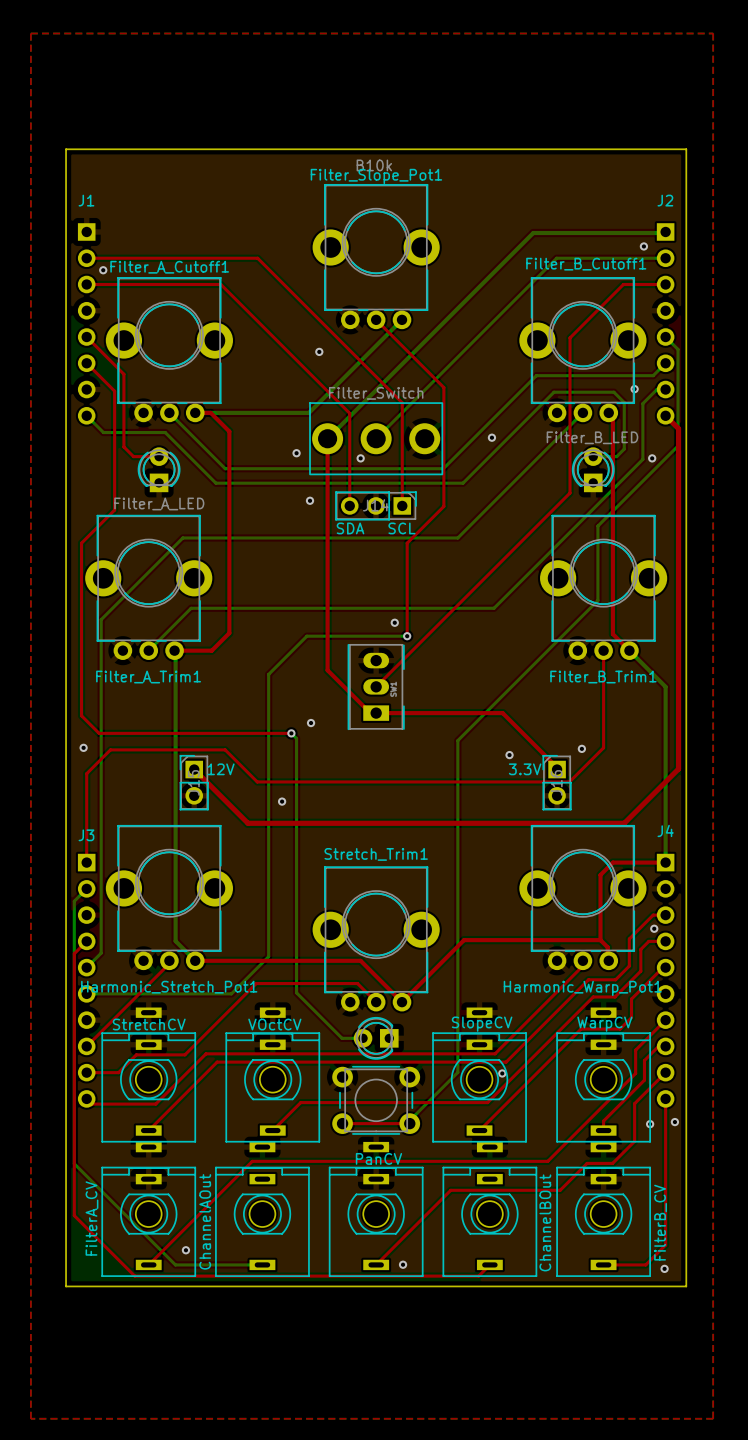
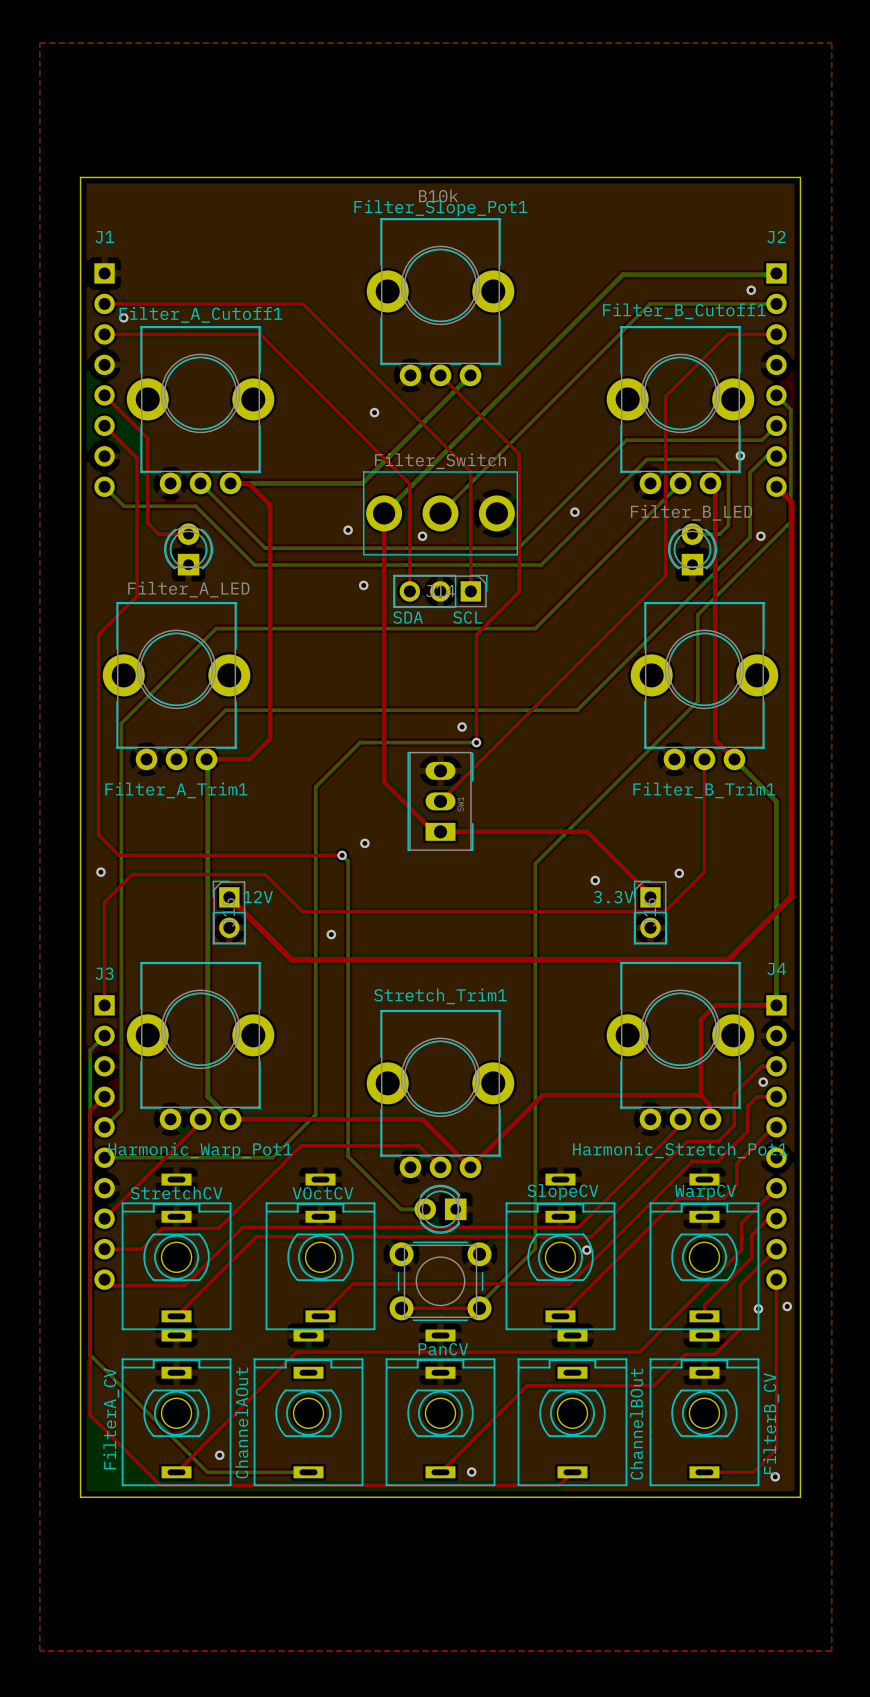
Harmonic_Stretch_Pot1 name: Harmonic_Stretch_Pot1 (169, 987) -> Harmonic_Warp_Pot1 (200, 1150)
Harmonic_Warp_Pot1 name: Harmonic_Warp_Pot1 (582, 988) -> Harmonic_Stretch_Pot1 (680, 1150)

